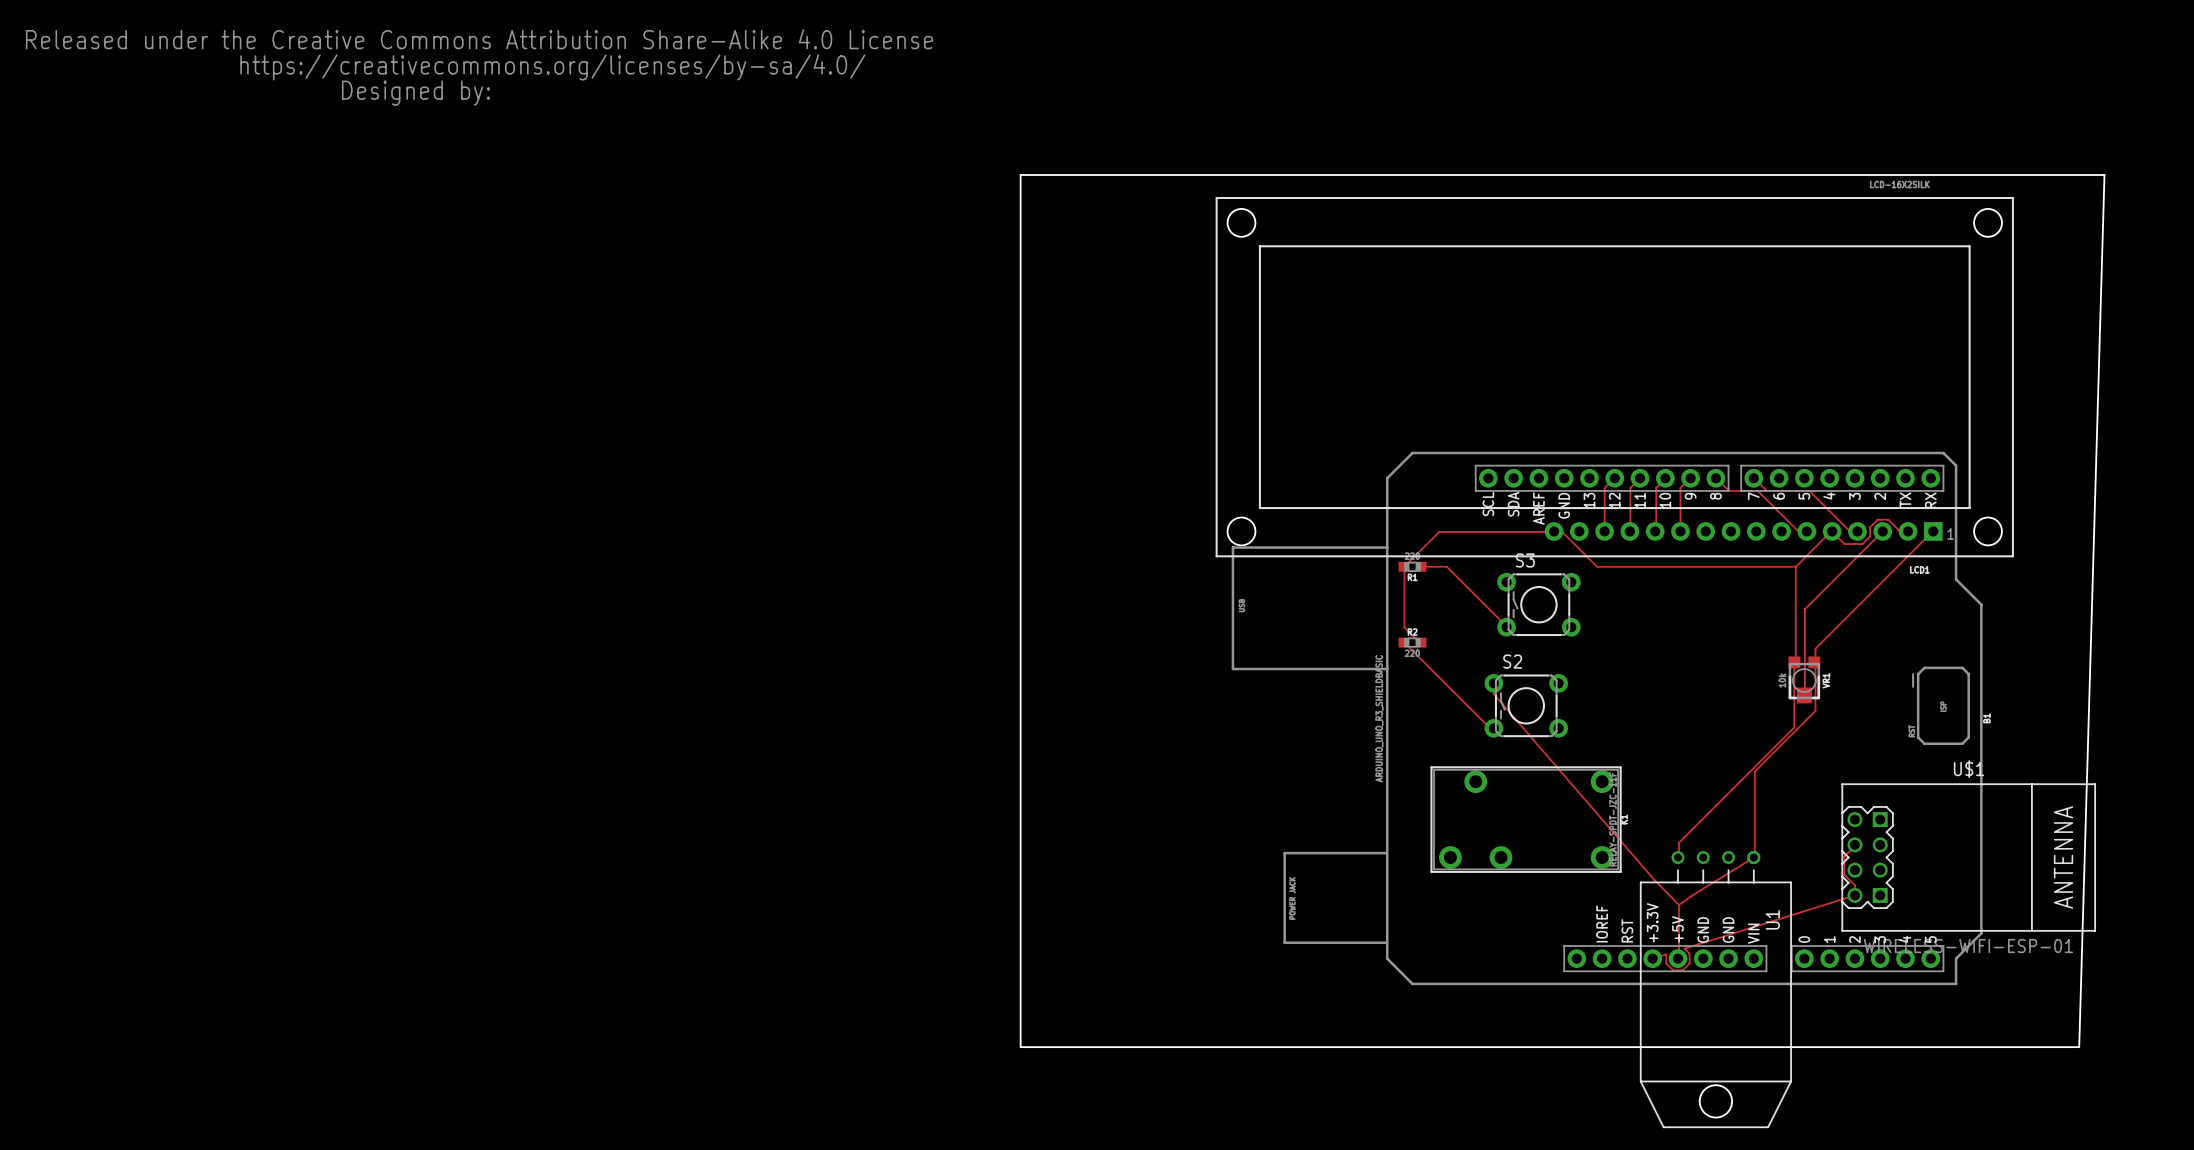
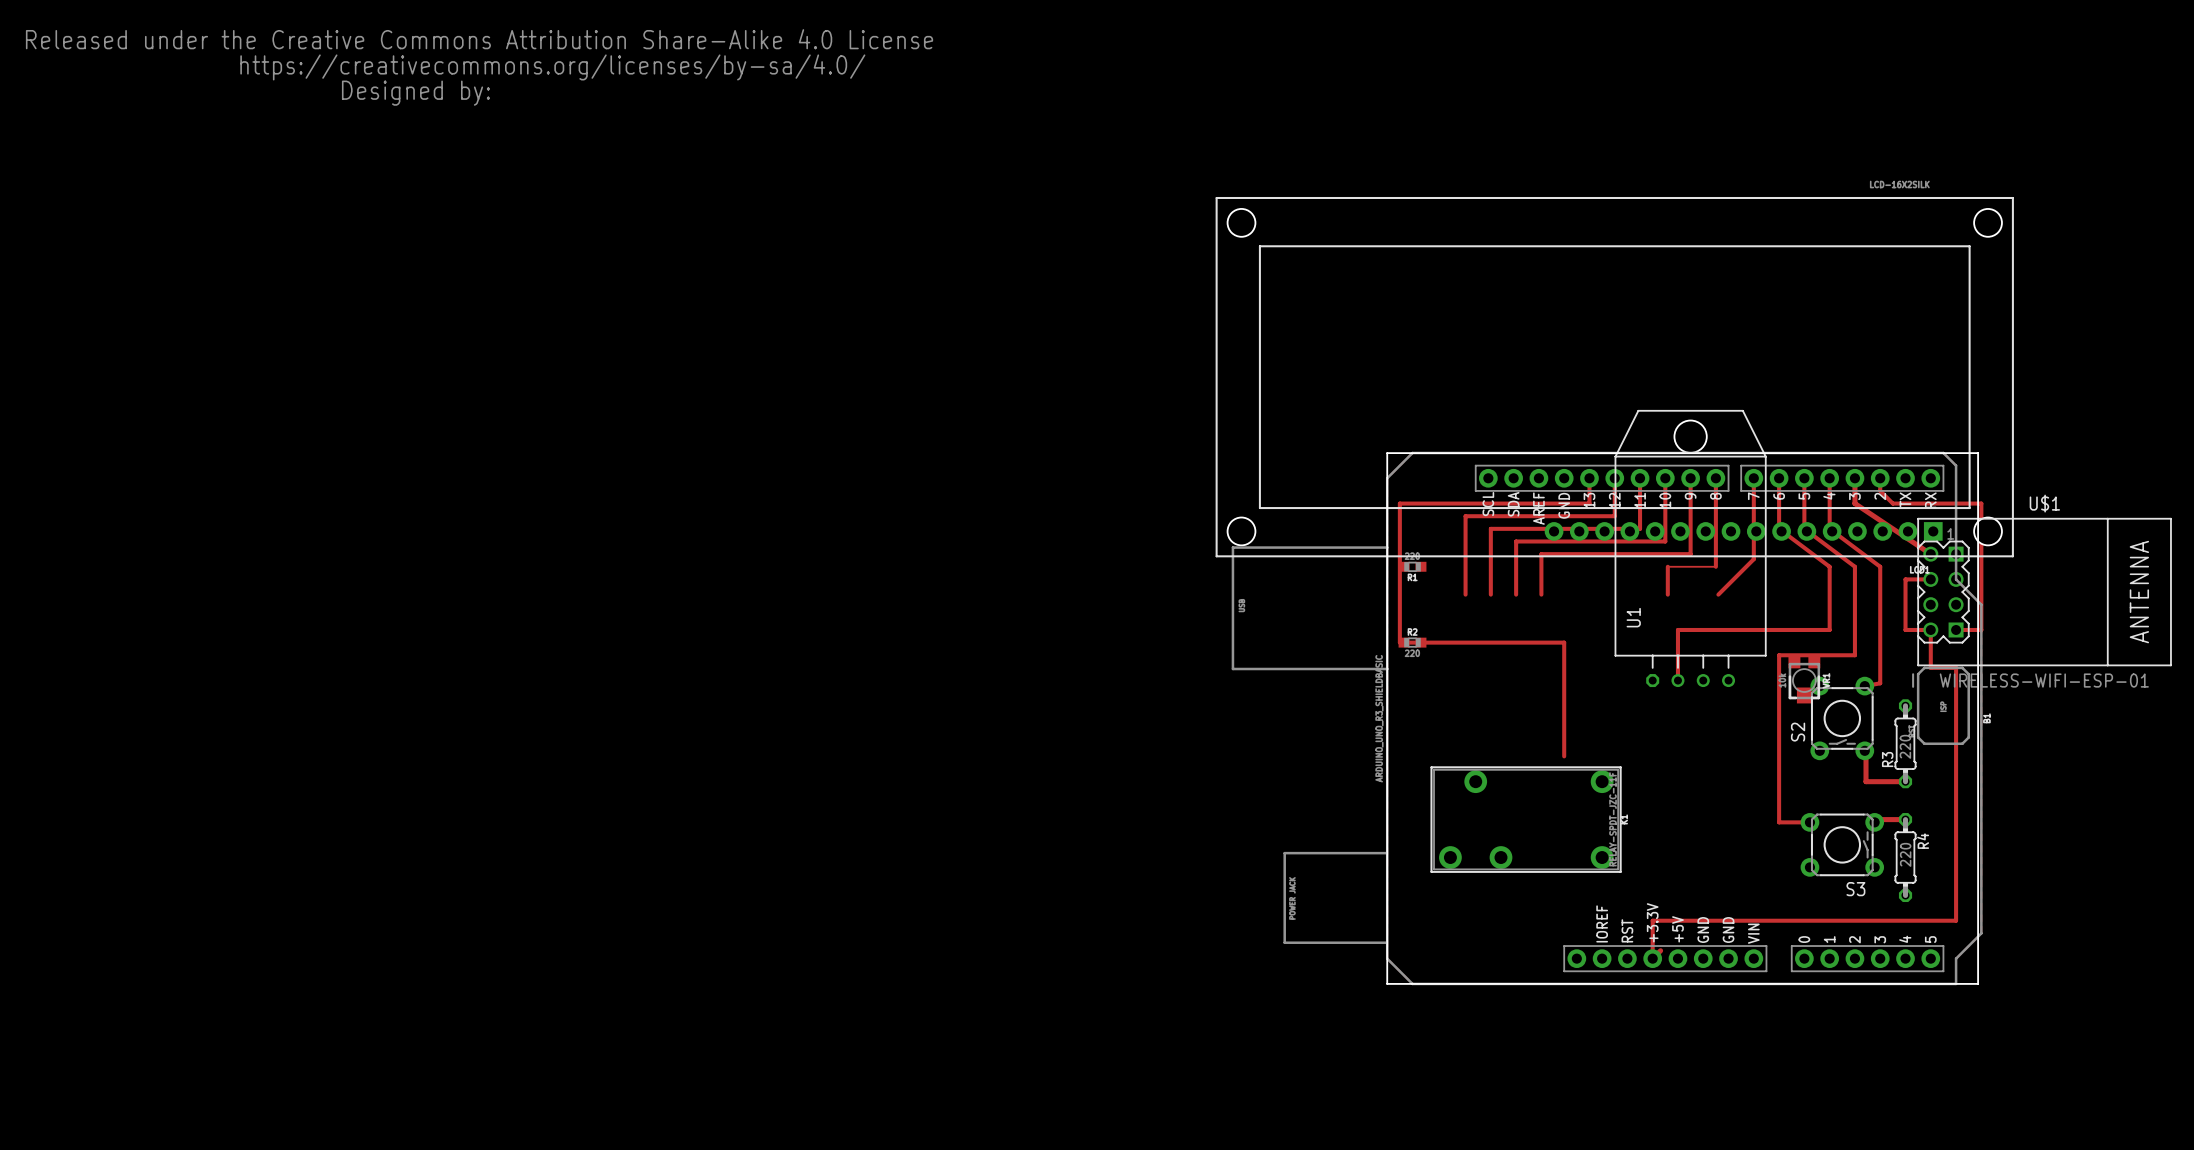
board edge: (1020, 175) (2104, 175) (2079, 1047) (1020, 1047) (1020, 175) -> none
board edge: none -> (1387, 453) (1978, 453) (1978, 983) (1387, 983) (1387, 453)
track: (1614, 478) (1604, 487) (1604, 531) -> (1614, 478) (1614, 516) (1465, 516) (1465, 594)
track: (1640, 478) (1630, 487) (1629, 531) -> (1640, 478) (1640, 528) (1490, 528) (1490, 594)
track: (1665, 478) (1656, 487) (1655, 531) -> none
track: none -> (1665, 478) (1665, 541) (1516, 541) (1516, 594)
track: (1690, 478) (1680, 487) (1680, 531) -> (1690, 478) (1690, 554) (1541, 554) (1541, 594)
track: (1715, 478) (1729, 490) (1757, 490) (1797, 530) (1806, 531) -> (1715, 478) (1715, 566)
track: (1753, 478) (1766, 490) (1809, 490) (1848, 530) (1857, 531) -> (1753, 478) (1753, 559) (1718, 594)
track: none -> (1779, 478) (1779, 528) (1829, 566) (1829, 629) (1677, 629) (1677, 680)
track: none -> (1804, 478) (1804, 528) (1854, 566) (1854, 655) (1779, 655) (1779, 822) (1809, 822)
track: none -> (1829, 478) (1829, 528) (1880, 566) (1880, 683) (1864, 685)
track: none -> (1854, 478) (1854, 503) (1930, 554)
track: none -> (1880, 478) (1880, 490) (1892, 503) (1981, 503) (1981, 629) (1956, 629)
track: (1882, 531) (1804, 609) (1804, 695) -> none
track: (1908, 531) (1898, 530) (1888, 519) (1877, 519) (1870, 527) (1870, 536) (1862, 544) (1844, 544) (1830, 531) (1795, 566) -> none
track: (1933, 531) (1815, 648) (1815, 710) (1754, 771) (1754, 856) (1678, 905) -> none
track: (1420, 566) (1446, 566) (1506, 627) -> none
track: (1667, 566) (1597, 566) (1562, 531) (1439, 531) (1404, 566) (1404, 627) (1419, 642) -> (1589, 478) (1589, 503) (1399, 503) (1399, 642) (1419, 642)
track: none -> (1667, 566) (1667, 594)
track: (1715, 566) (1795, 566) -> none
track: (1795, 566) (1794, 727) (1678, 842) (1677, 857) -> none
track: none -> (1930, 579) (1905, 579) (1905, 629) (1930, 629) (1930, 667) (1956, 667) (1956, 920) (1652, 920) (1652, 958) (1660, 950)
S3 rotation: 0° (1538, 604) -> 180° (1842, 844)
S3 position: (1538, 604) -> (1842, 844)
track: (1404, 642) (1489, 727) (1493, 728) -> none
track: none -> (1420, 642) (1564, 642) (1564, 756)
track: (1493, 683) (1493, 694) (1654, 879) (1678, 905) -> none
S2 rotation: 0° (1526, 705) -> 90° counterclockwise (1842, 718)
S2 position: (1526, 705) -> (1842, 718)
R3: none -> 220 (1905, 743)
track: none -> (1864, 750) (1866, 781) (1905, 781)
track: none -> (1905, 819) (1875, 819) (1874, 822)
track: (1854, 844) (1844, 856) (1844, 874) (1854, 885) (1854, 895) (1684, 948) (1689, 953) (1689, 963) (1682, 970) (1673, 970) (1666, 963) (1666, 954) (1652, 958) -> none
R4: none -> 220 (1905, 857)
U$1 position: (1968, 857) -> (2044, 592)
track: (1678, 905) (1678, 958) -> none
U1 rotation: 0° (1715, 989) -> 180° (1690, 548)
U1 position: (1715, 989) -> (1690, 548)

